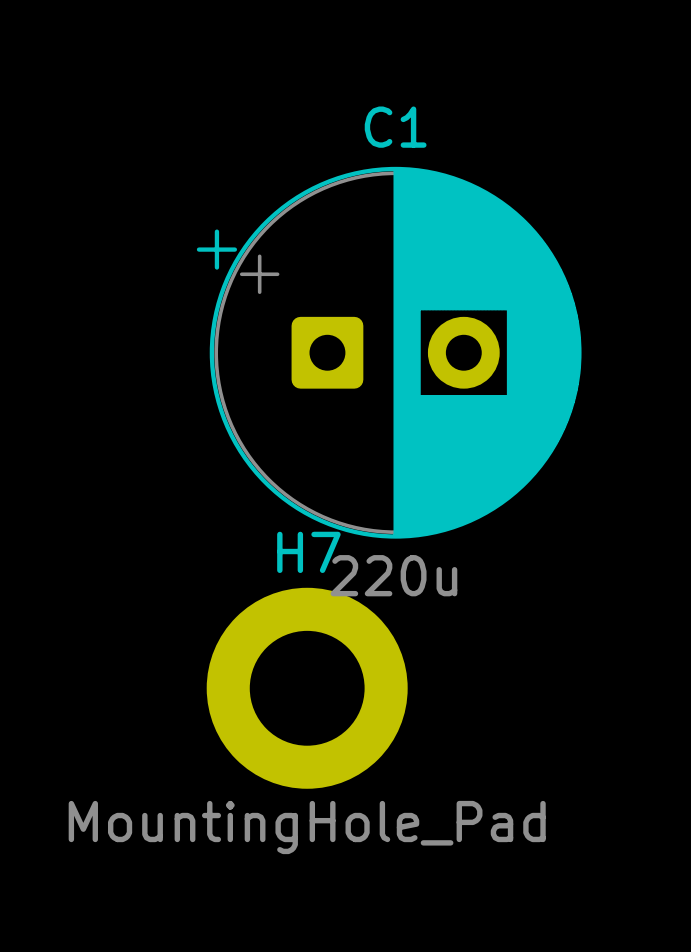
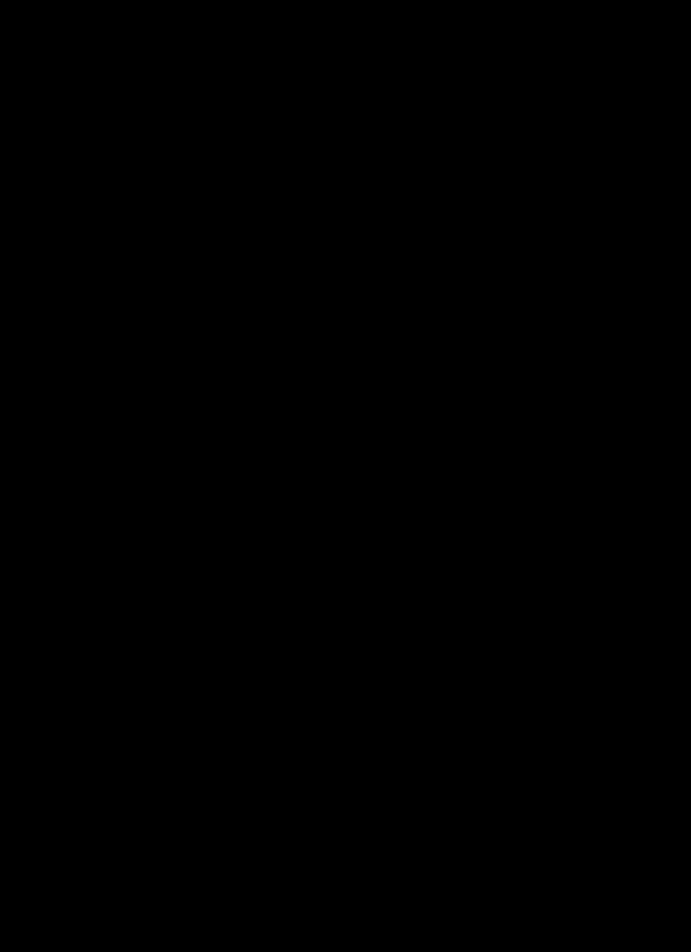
C1: 220u (389, 352) -> none
H7: MountingHole_Pad (307, 688) -> none

